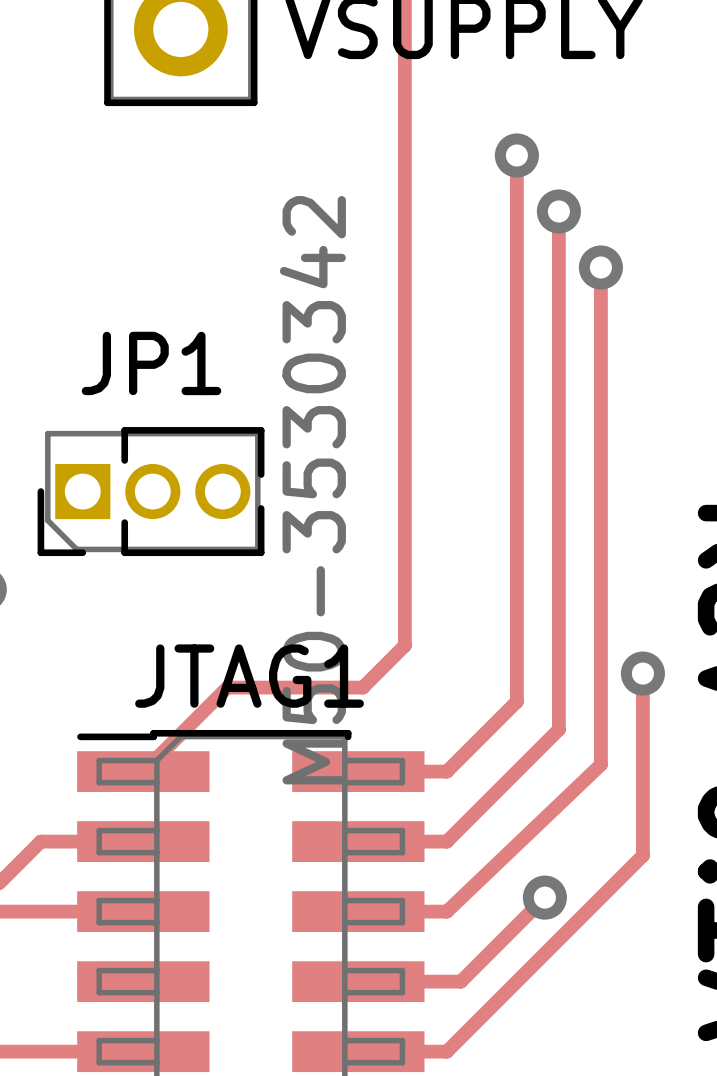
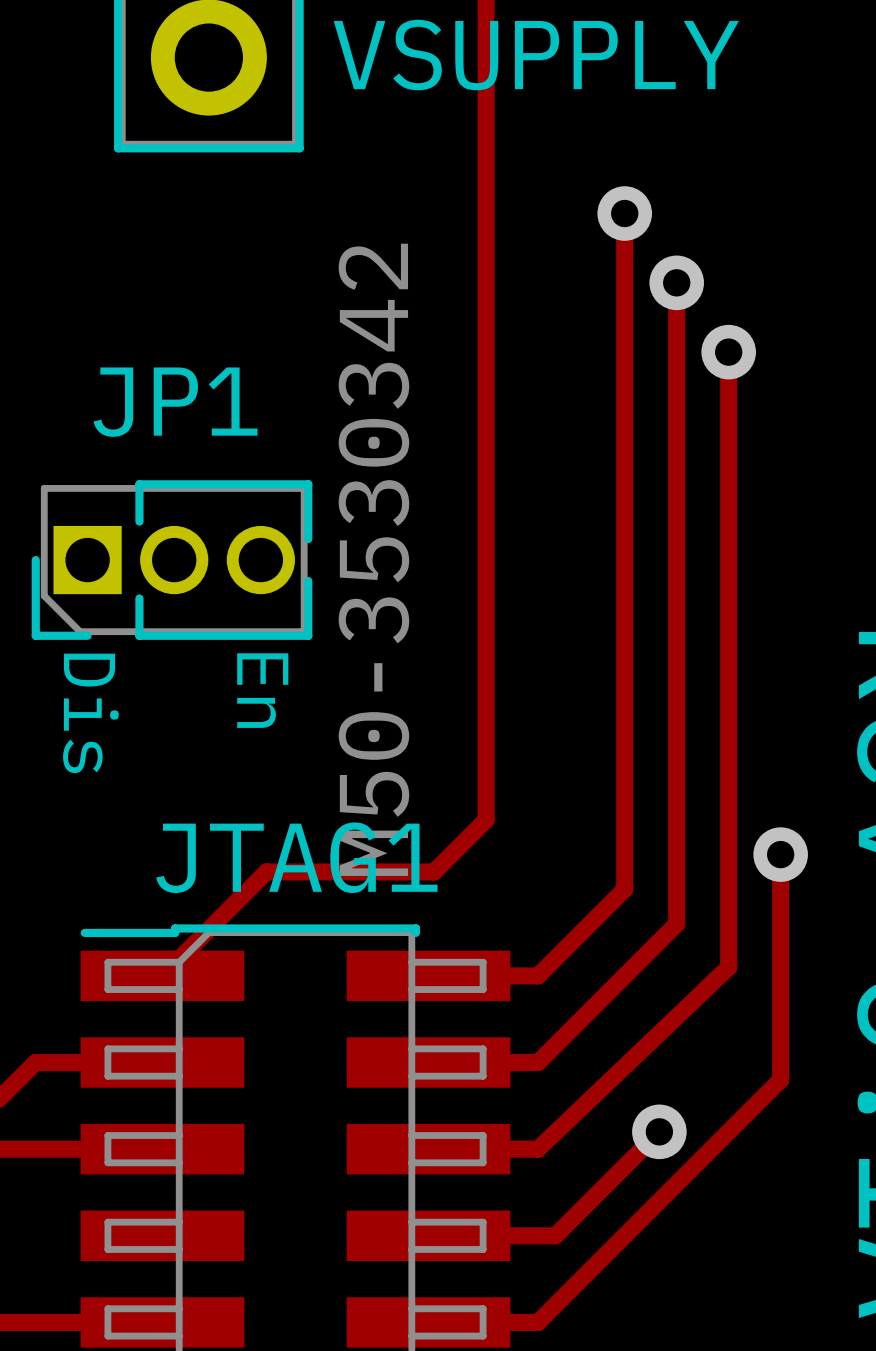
JP1 position: (151, 491) -> (172, 560)
text: none -> En (262, 690)
text: none -> Dis (90, 713)

